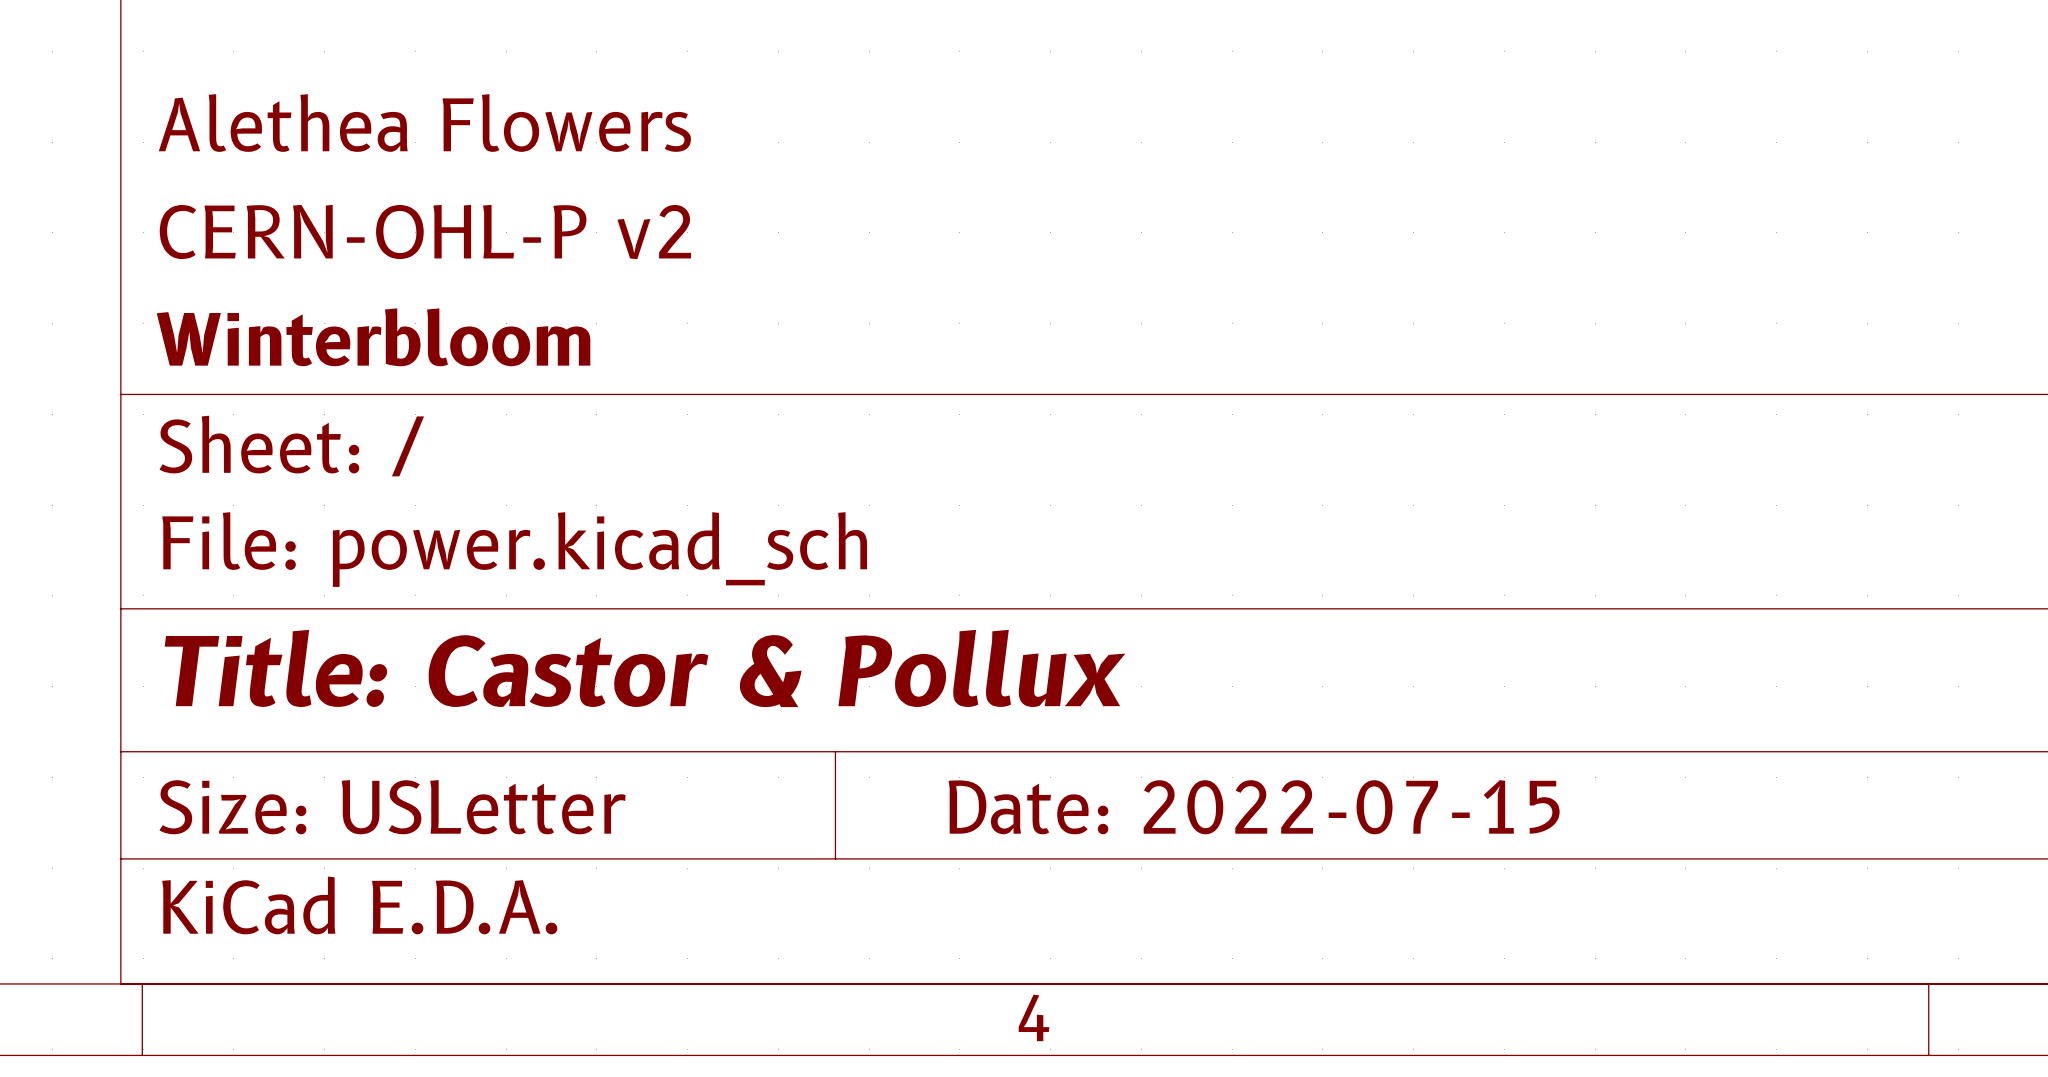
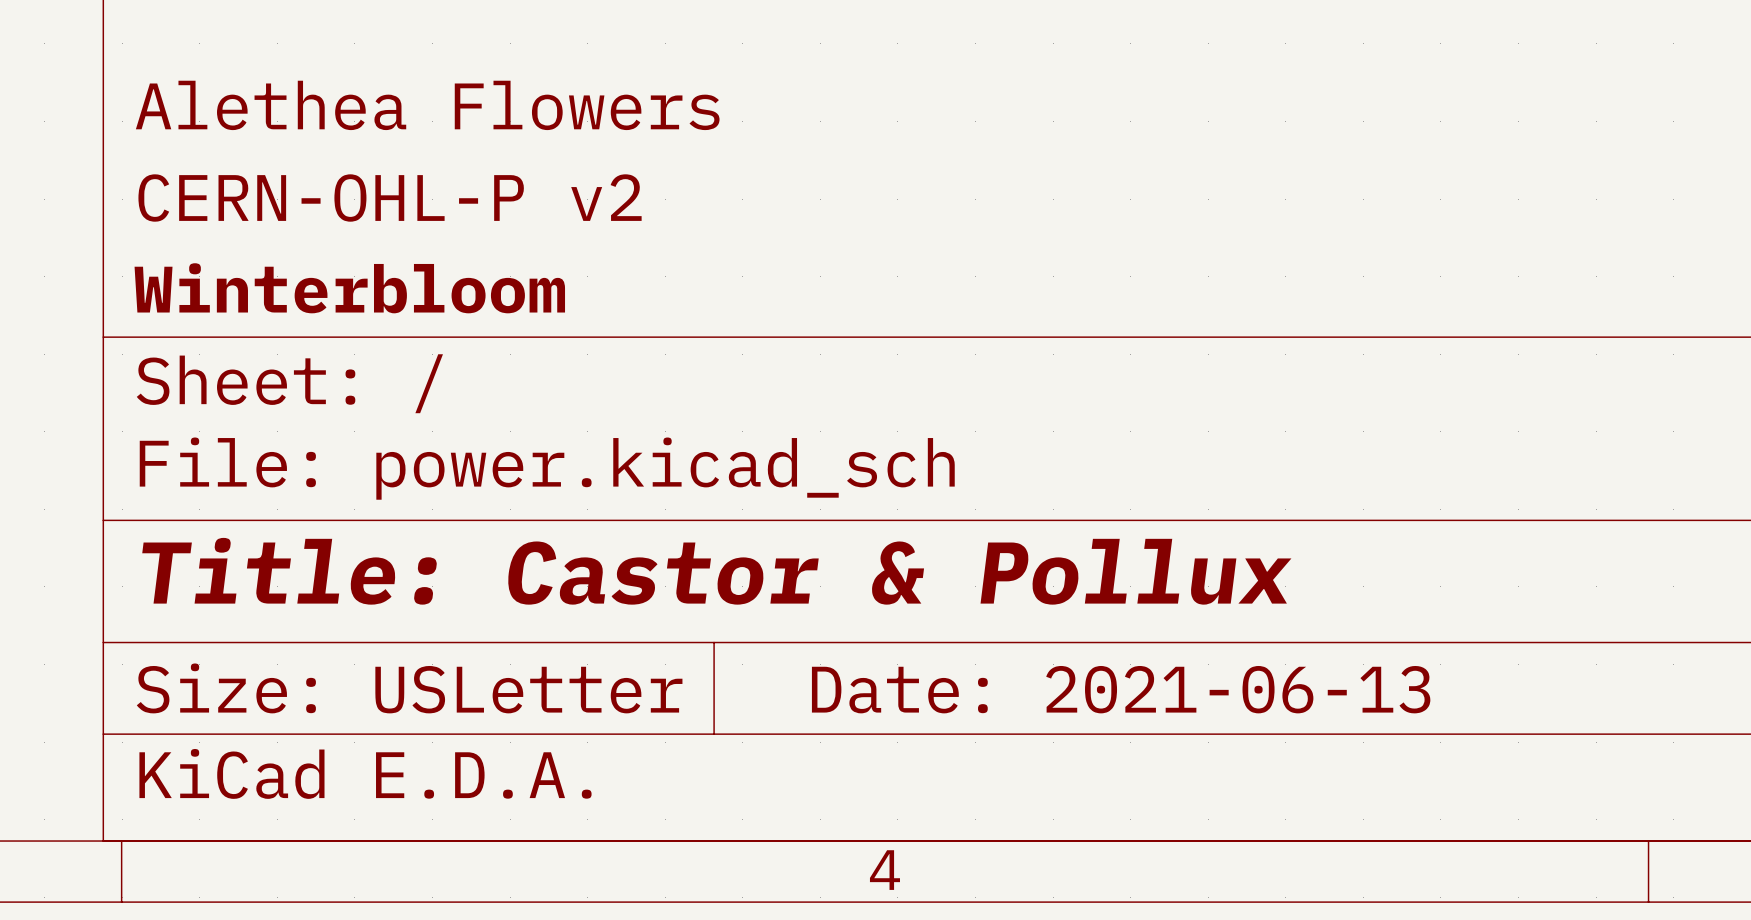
title block: Date: 2022-07-15 (1254, 807) -> Date: 2021-06-13 (1121, 689)

